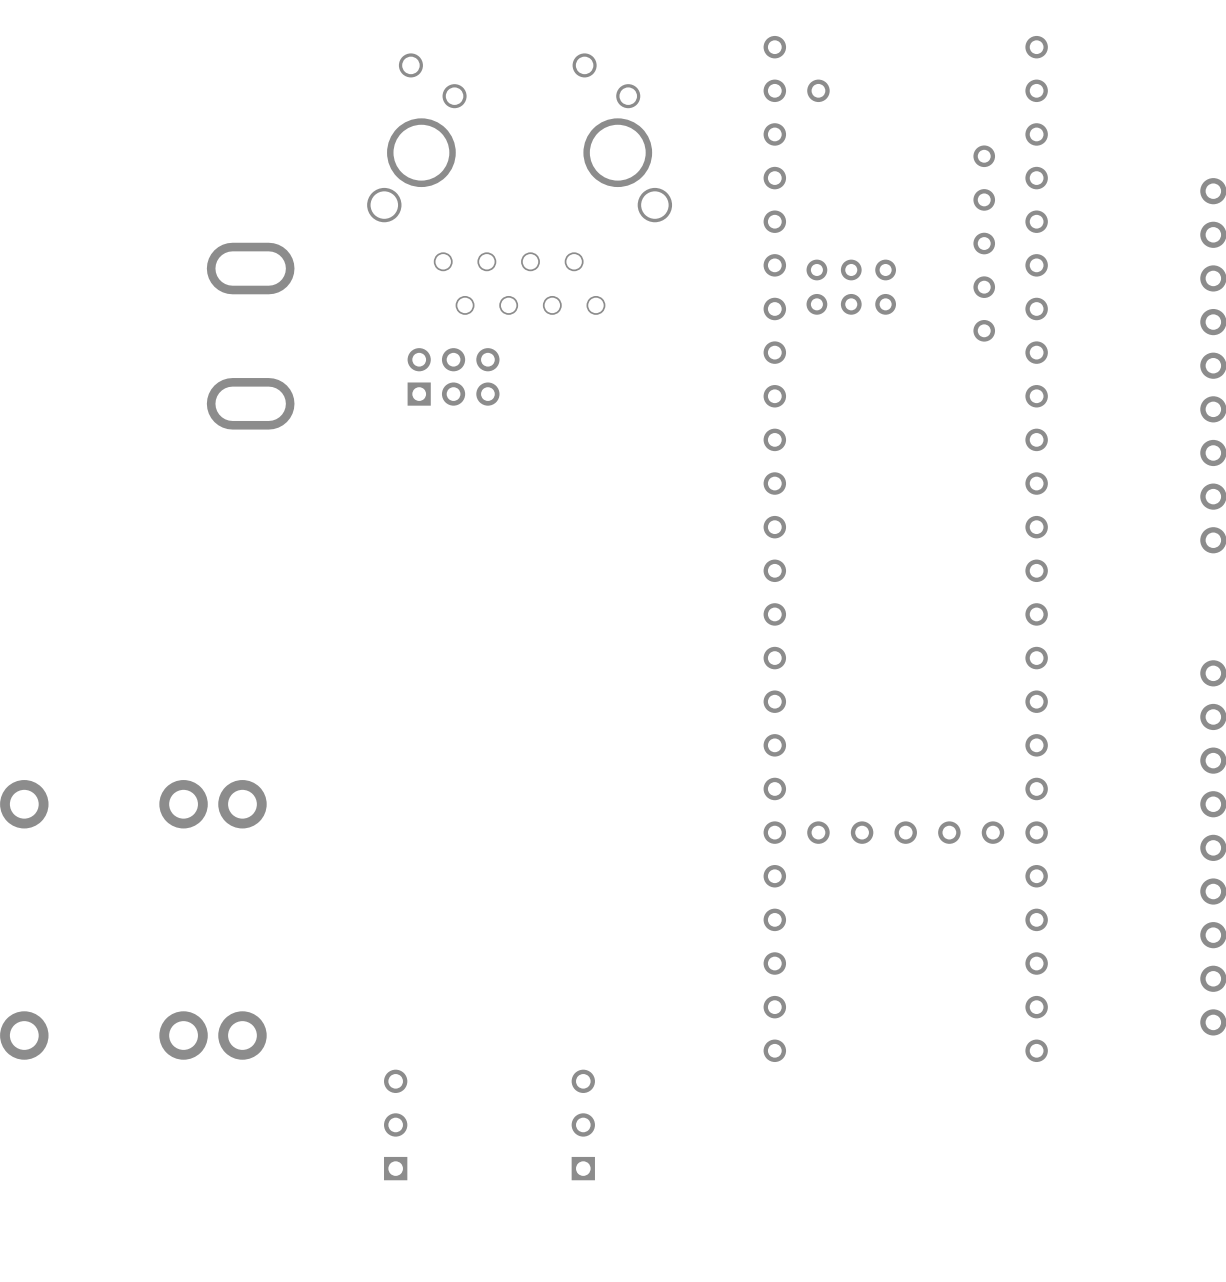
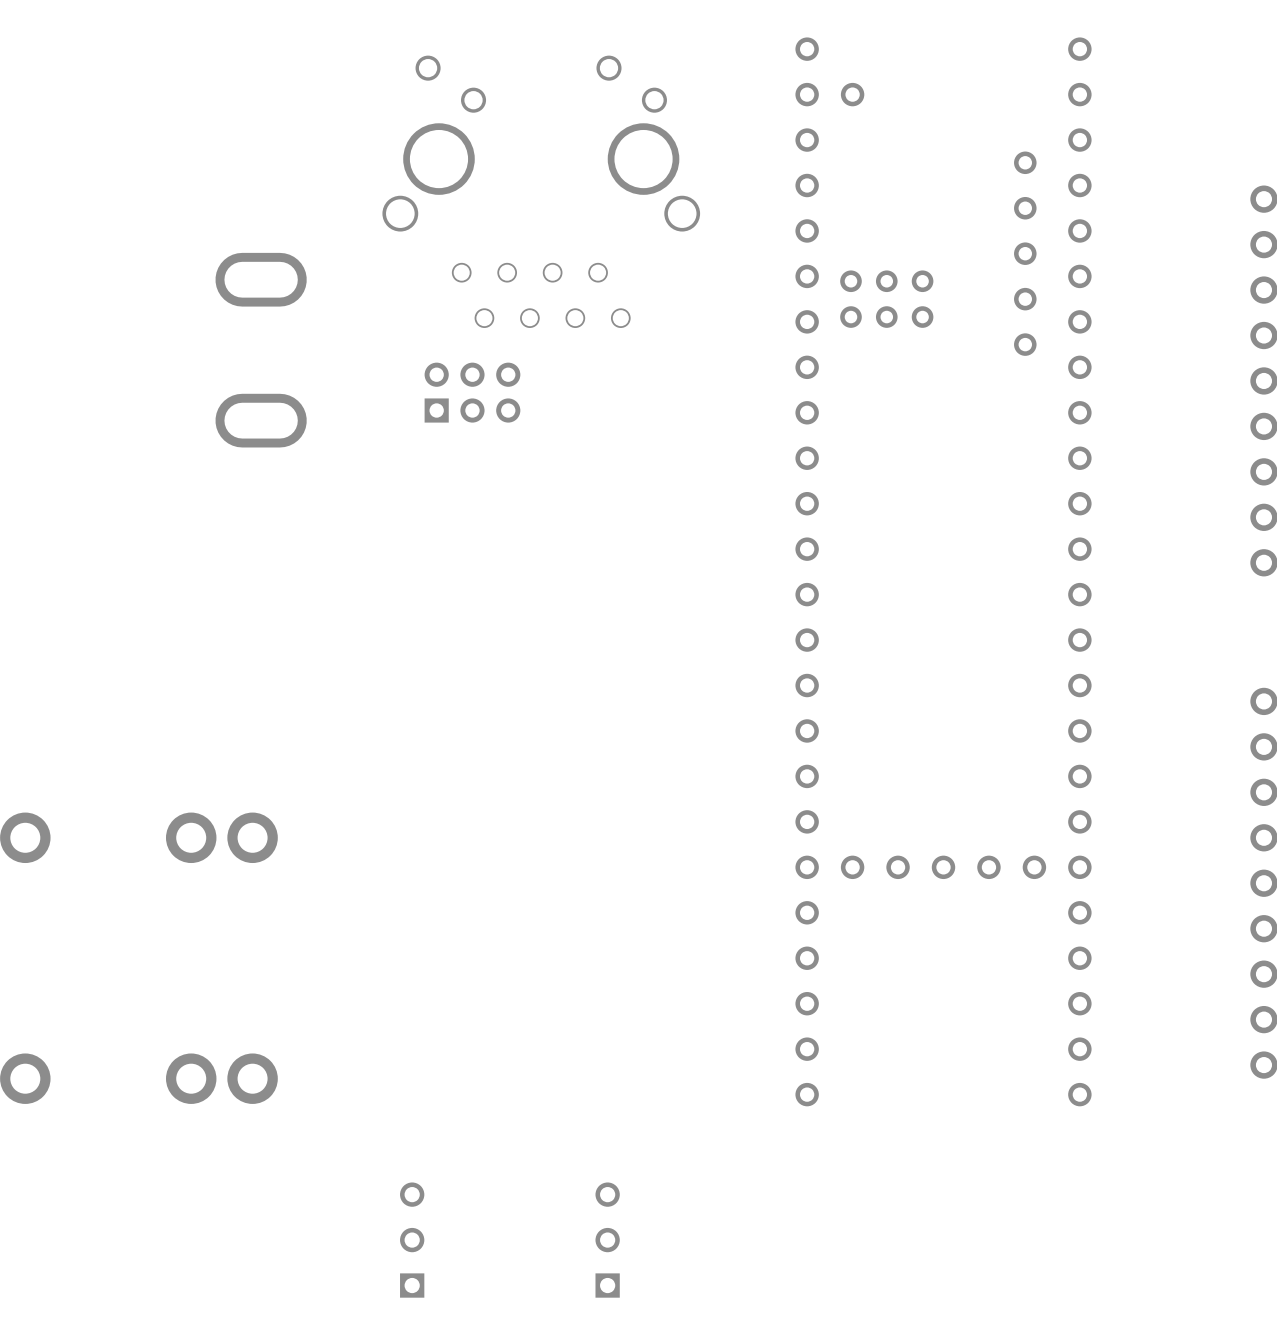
part position: (395, 1124) -> (412, 1240)
part position: (583, 1124) -> (607, 1240)

